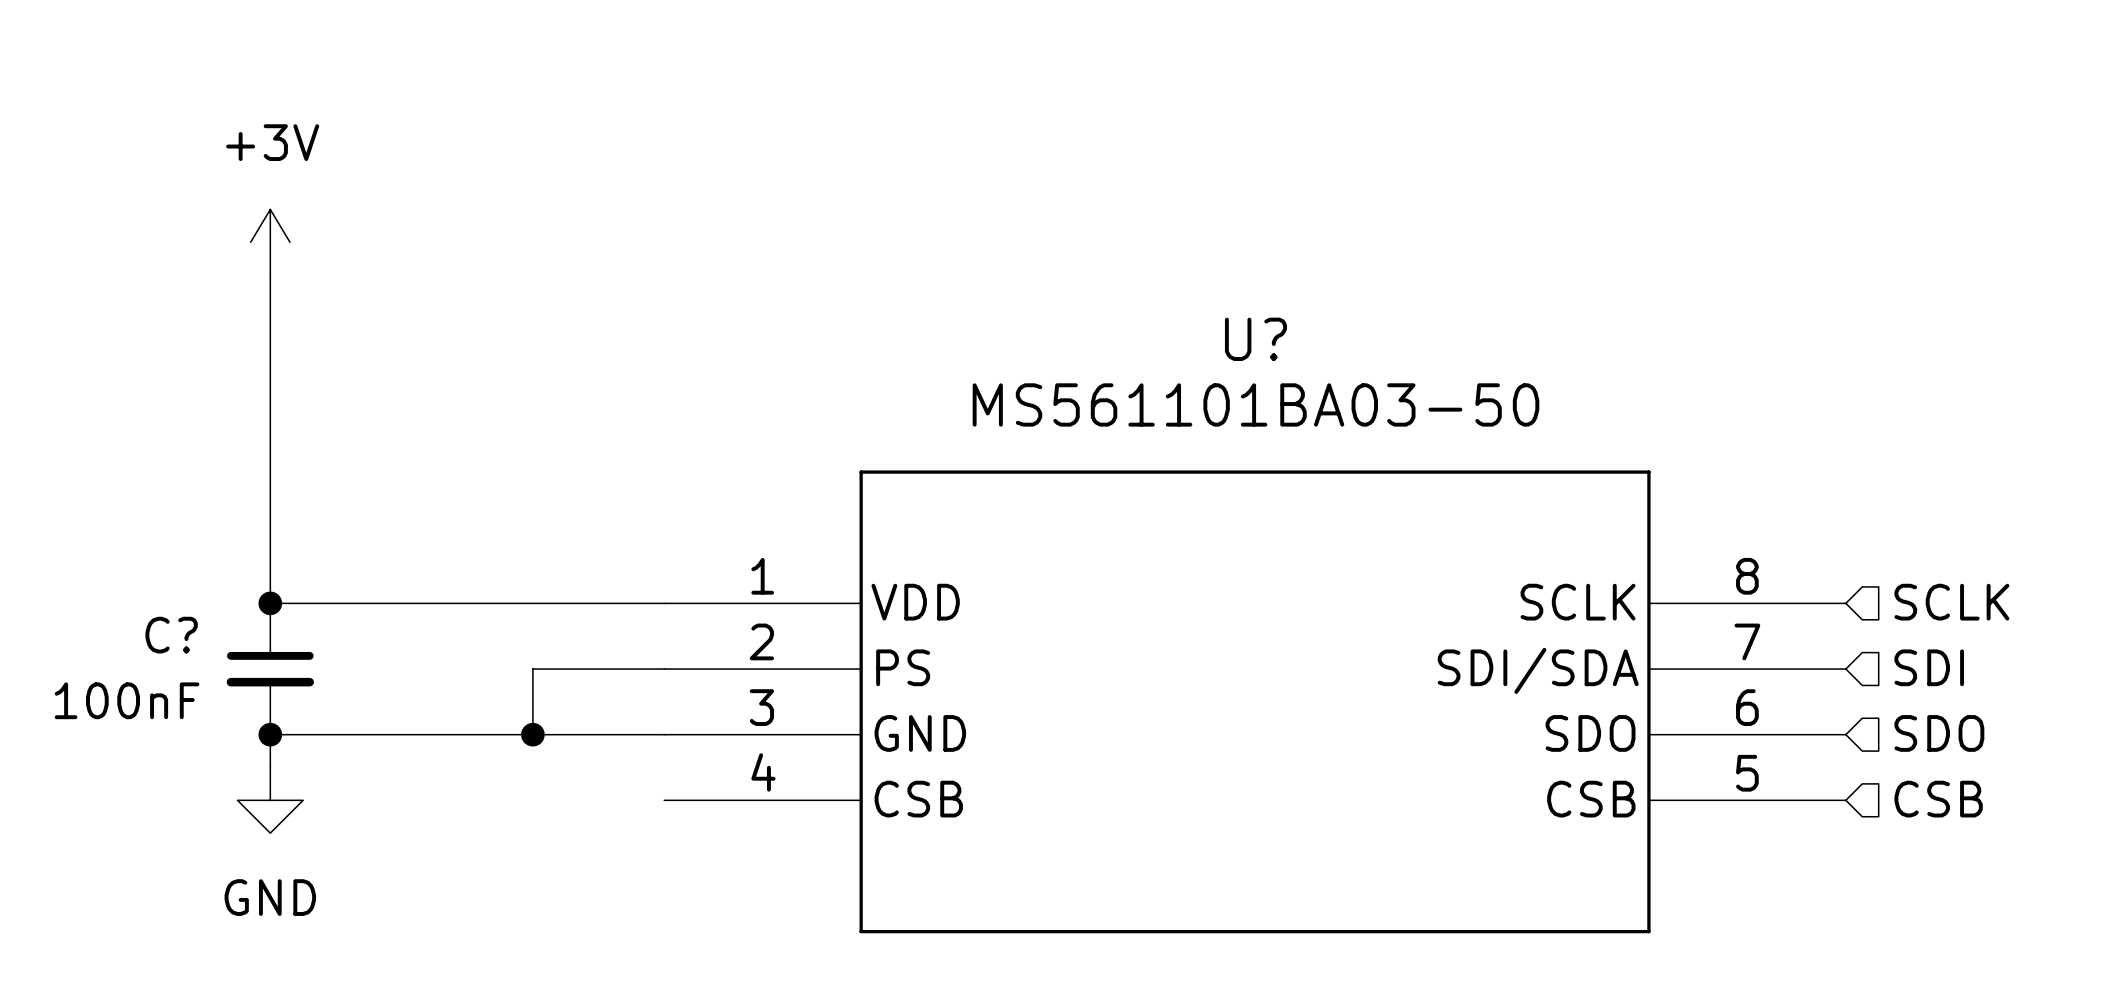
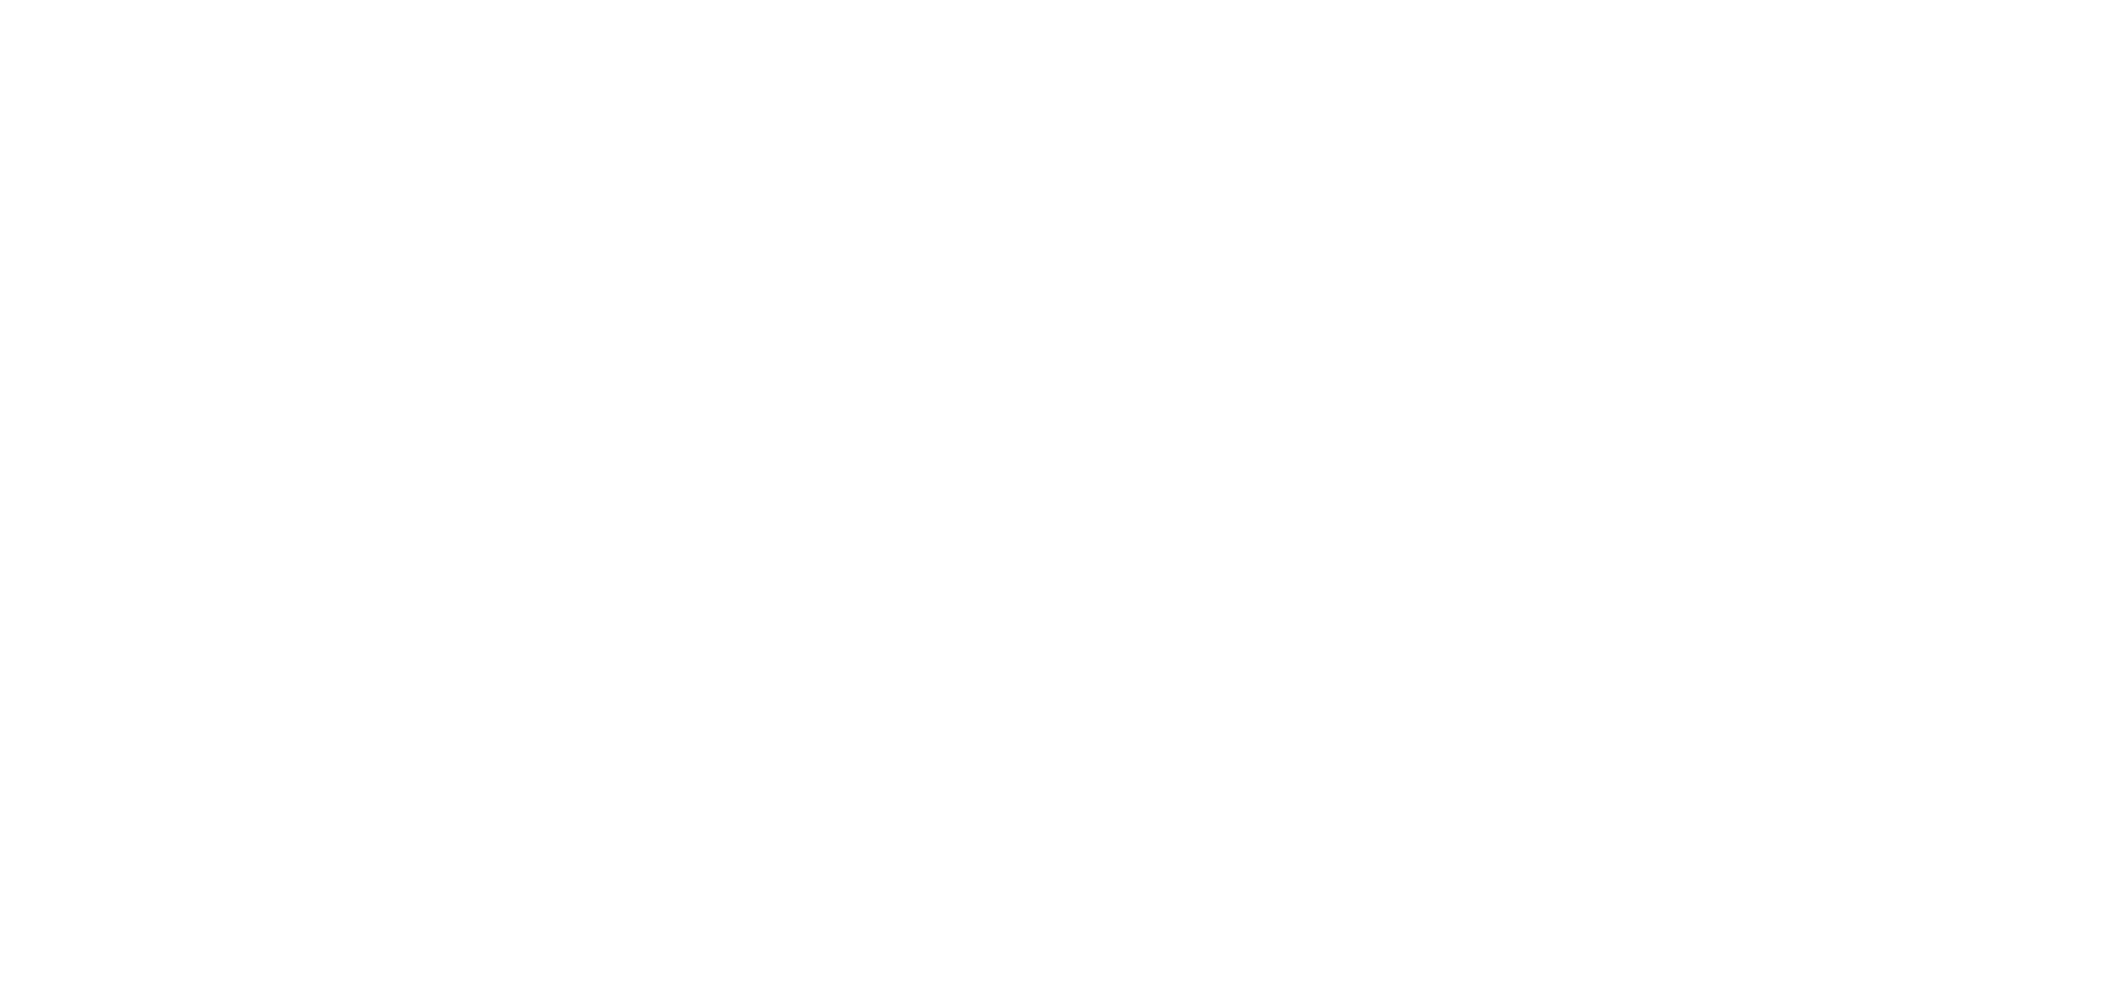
power symbol: +3V (270, 242) -> none
wire: (270, 275) (270, 603) (664, 603) -> none
hierarchical label: SCLK (1951, 602) -> none
junction: (270, 603) -> none
hierarchical label: SDI (1929, 667) -> none
C?: 100nF (270, 669) -> none
wire: (664, 669) (532, 669) (532, 734) -> none
U?: MS561101BA03-50 (1255, 701) -> none
hierarchical label: SDO (1939, 733) -> none
junction: (270, 734) -> none
junction: (532, 734) -> none
wire: (664, 734) (270, 734) (270, 767) -> none
hierarchical label: CSB (1938, 799) -> none
power symbol: GND (270, 800) -> none

